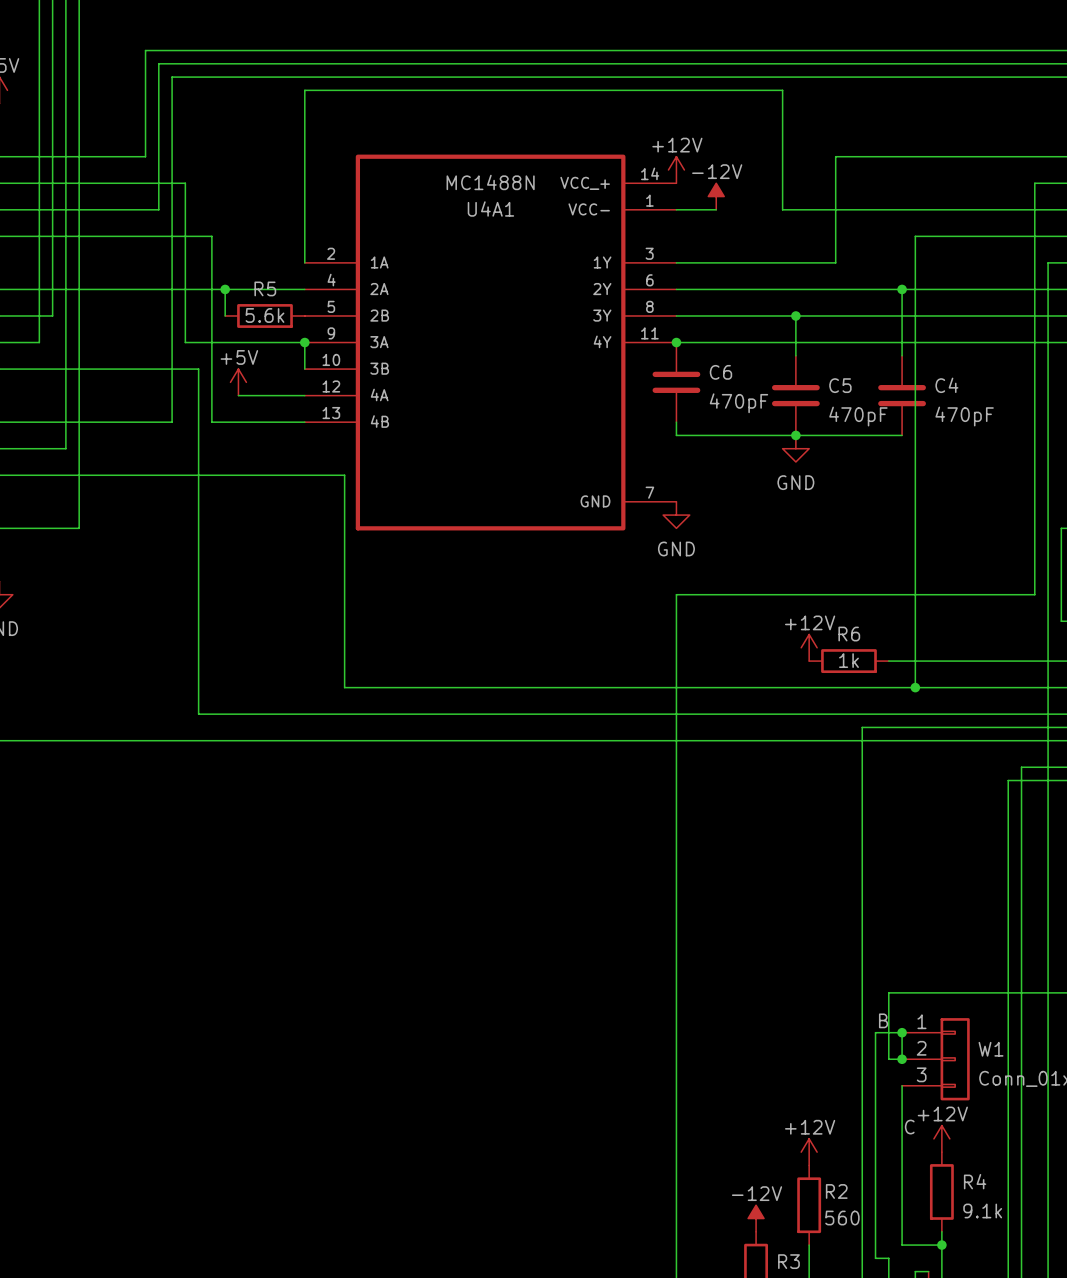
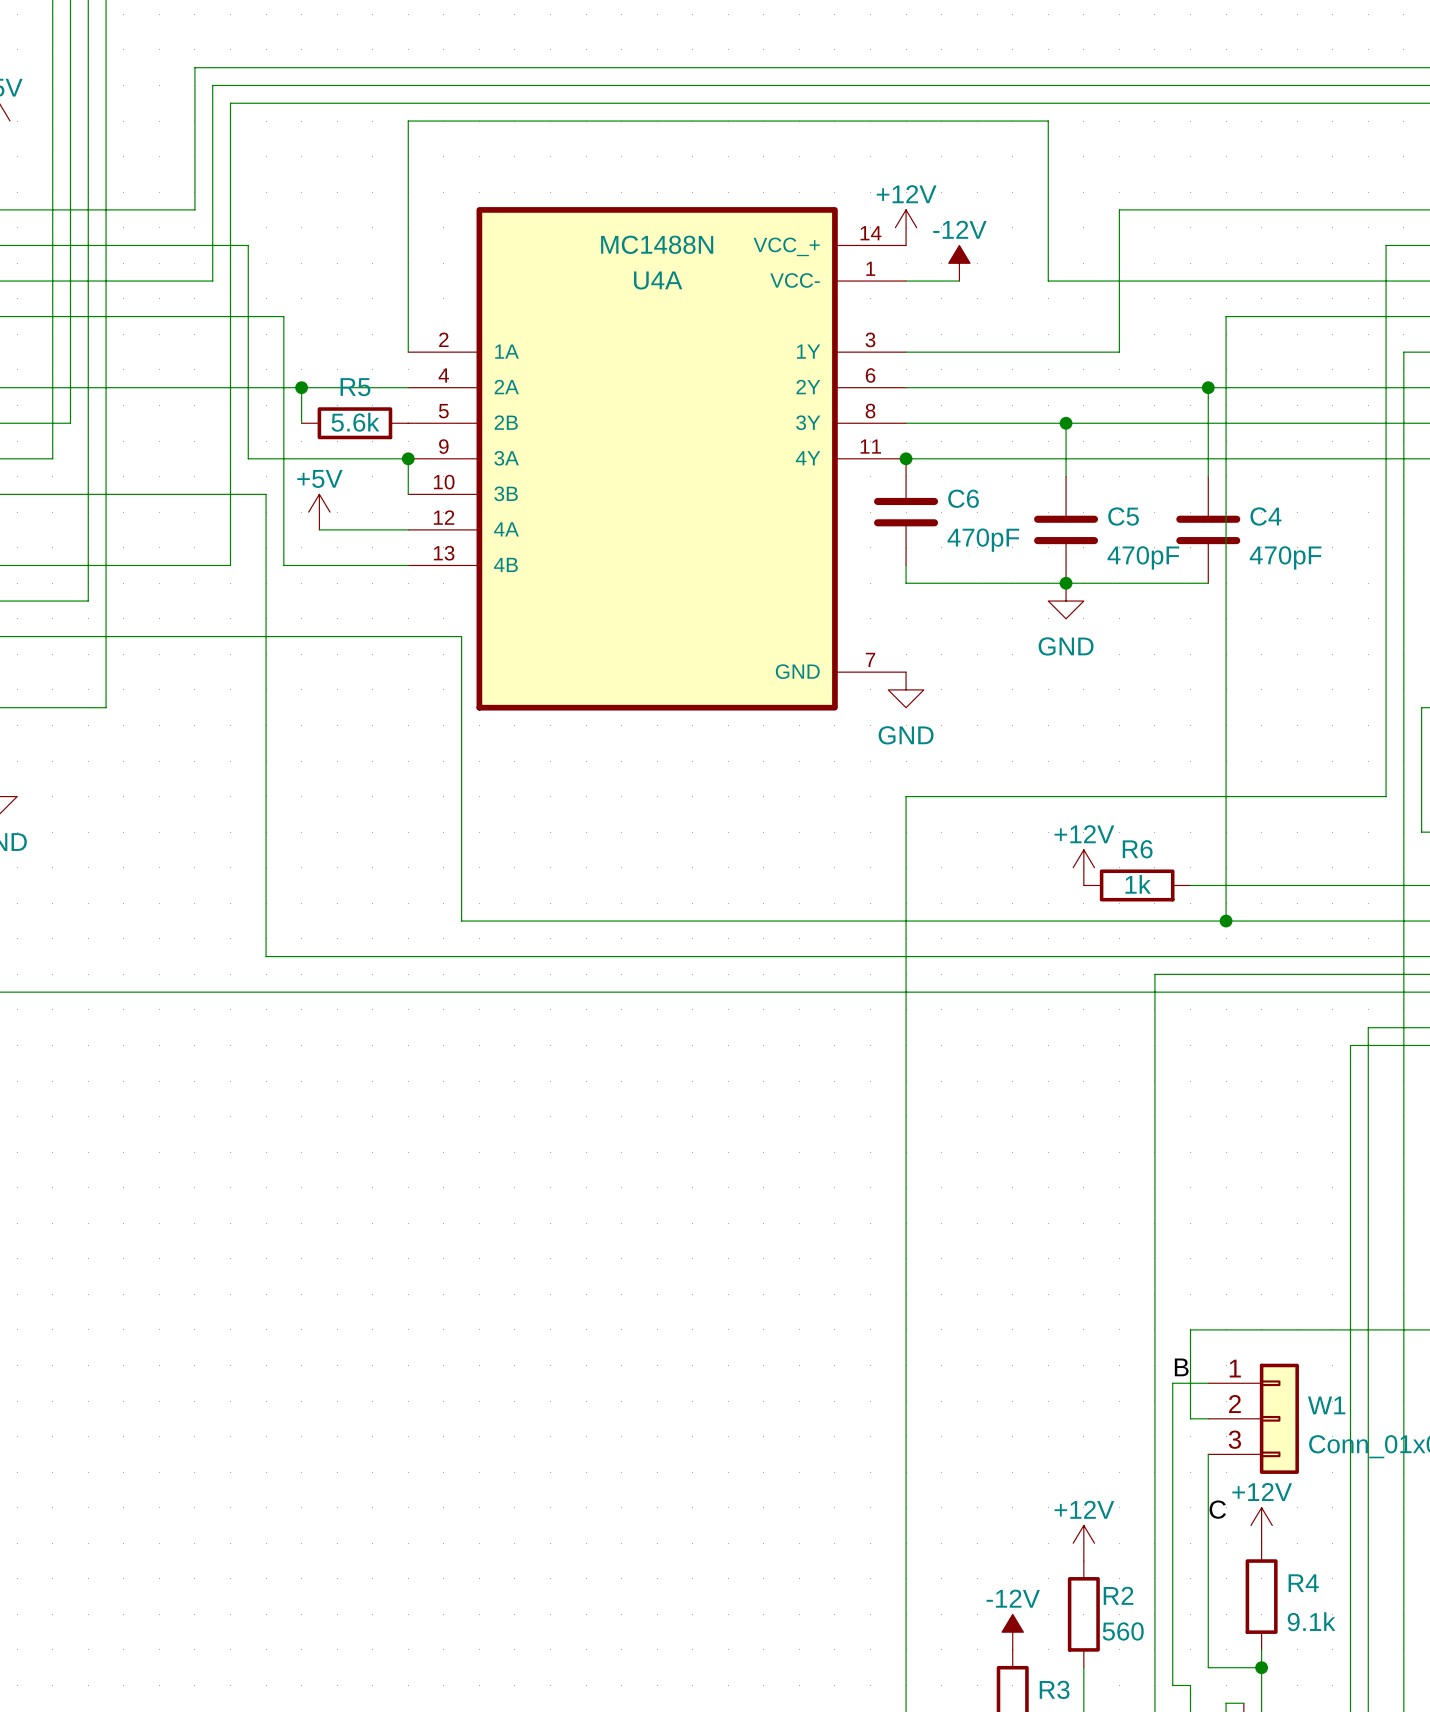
U4A1 name: U4A1 (490, 208) -> U4A (658, 280)
wire: (902, 1032) (902, 1059) -> none
junction: (902, 1032) -> none
junction: (902, 1059) -> none

